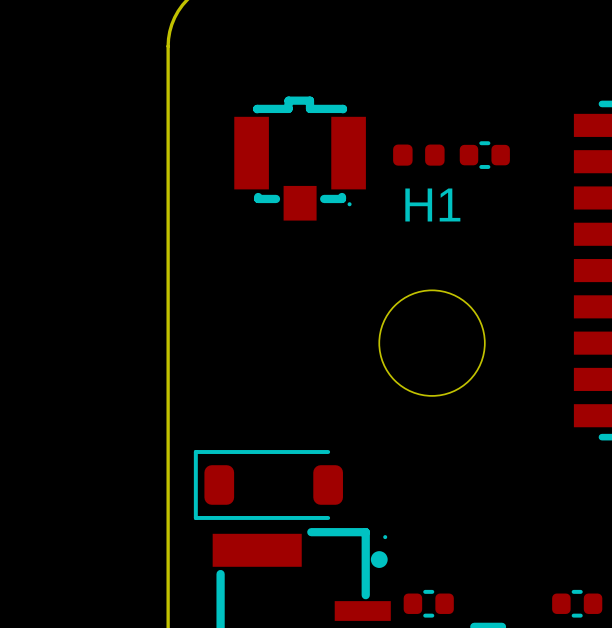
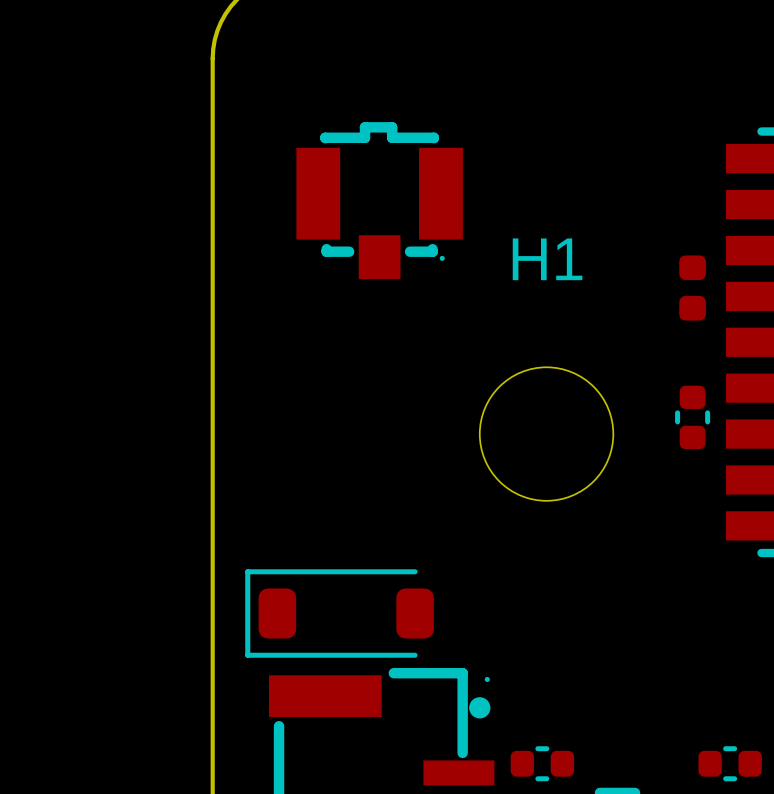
part rotation: 0° (418, 155) -> 90° clockwise (692, 288)
part position: (418, 155) -> (692, 288)
part rotation: 0° (484, 155) -> 90° clockwise (692, 417)
part position: (484, 155) -> (692, 417)

